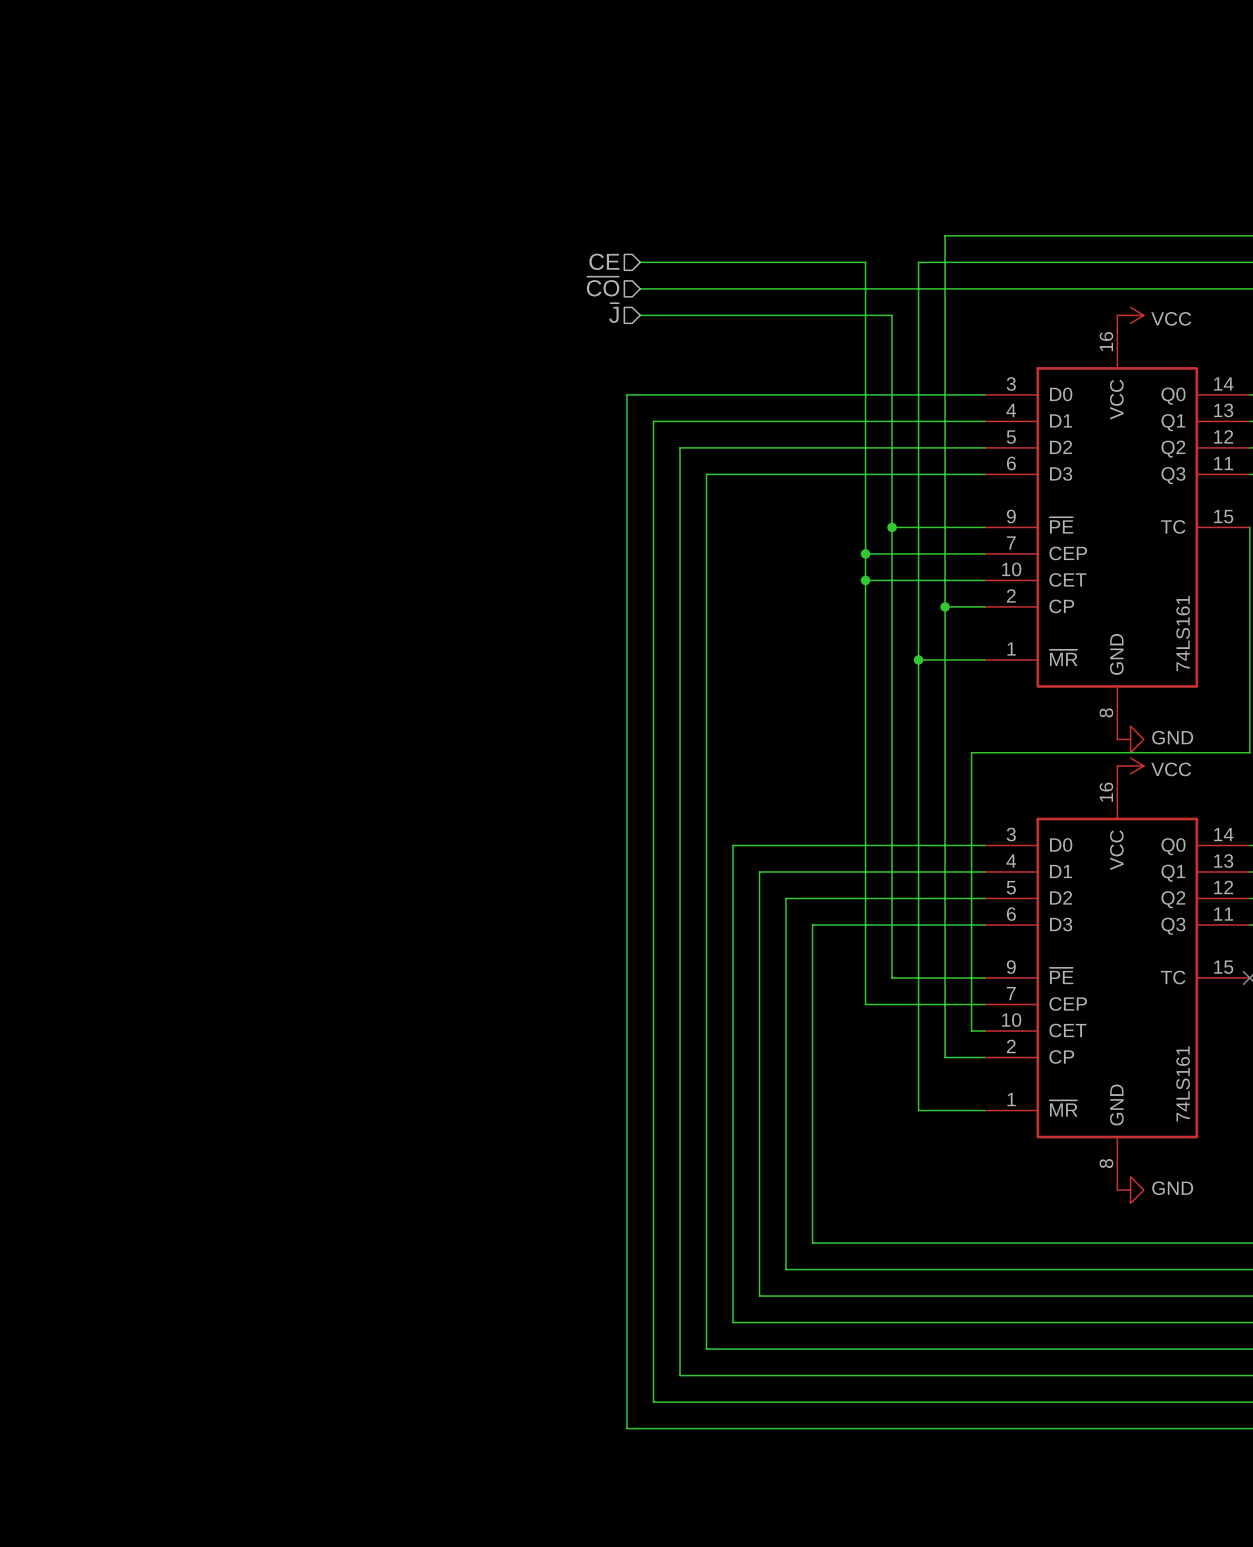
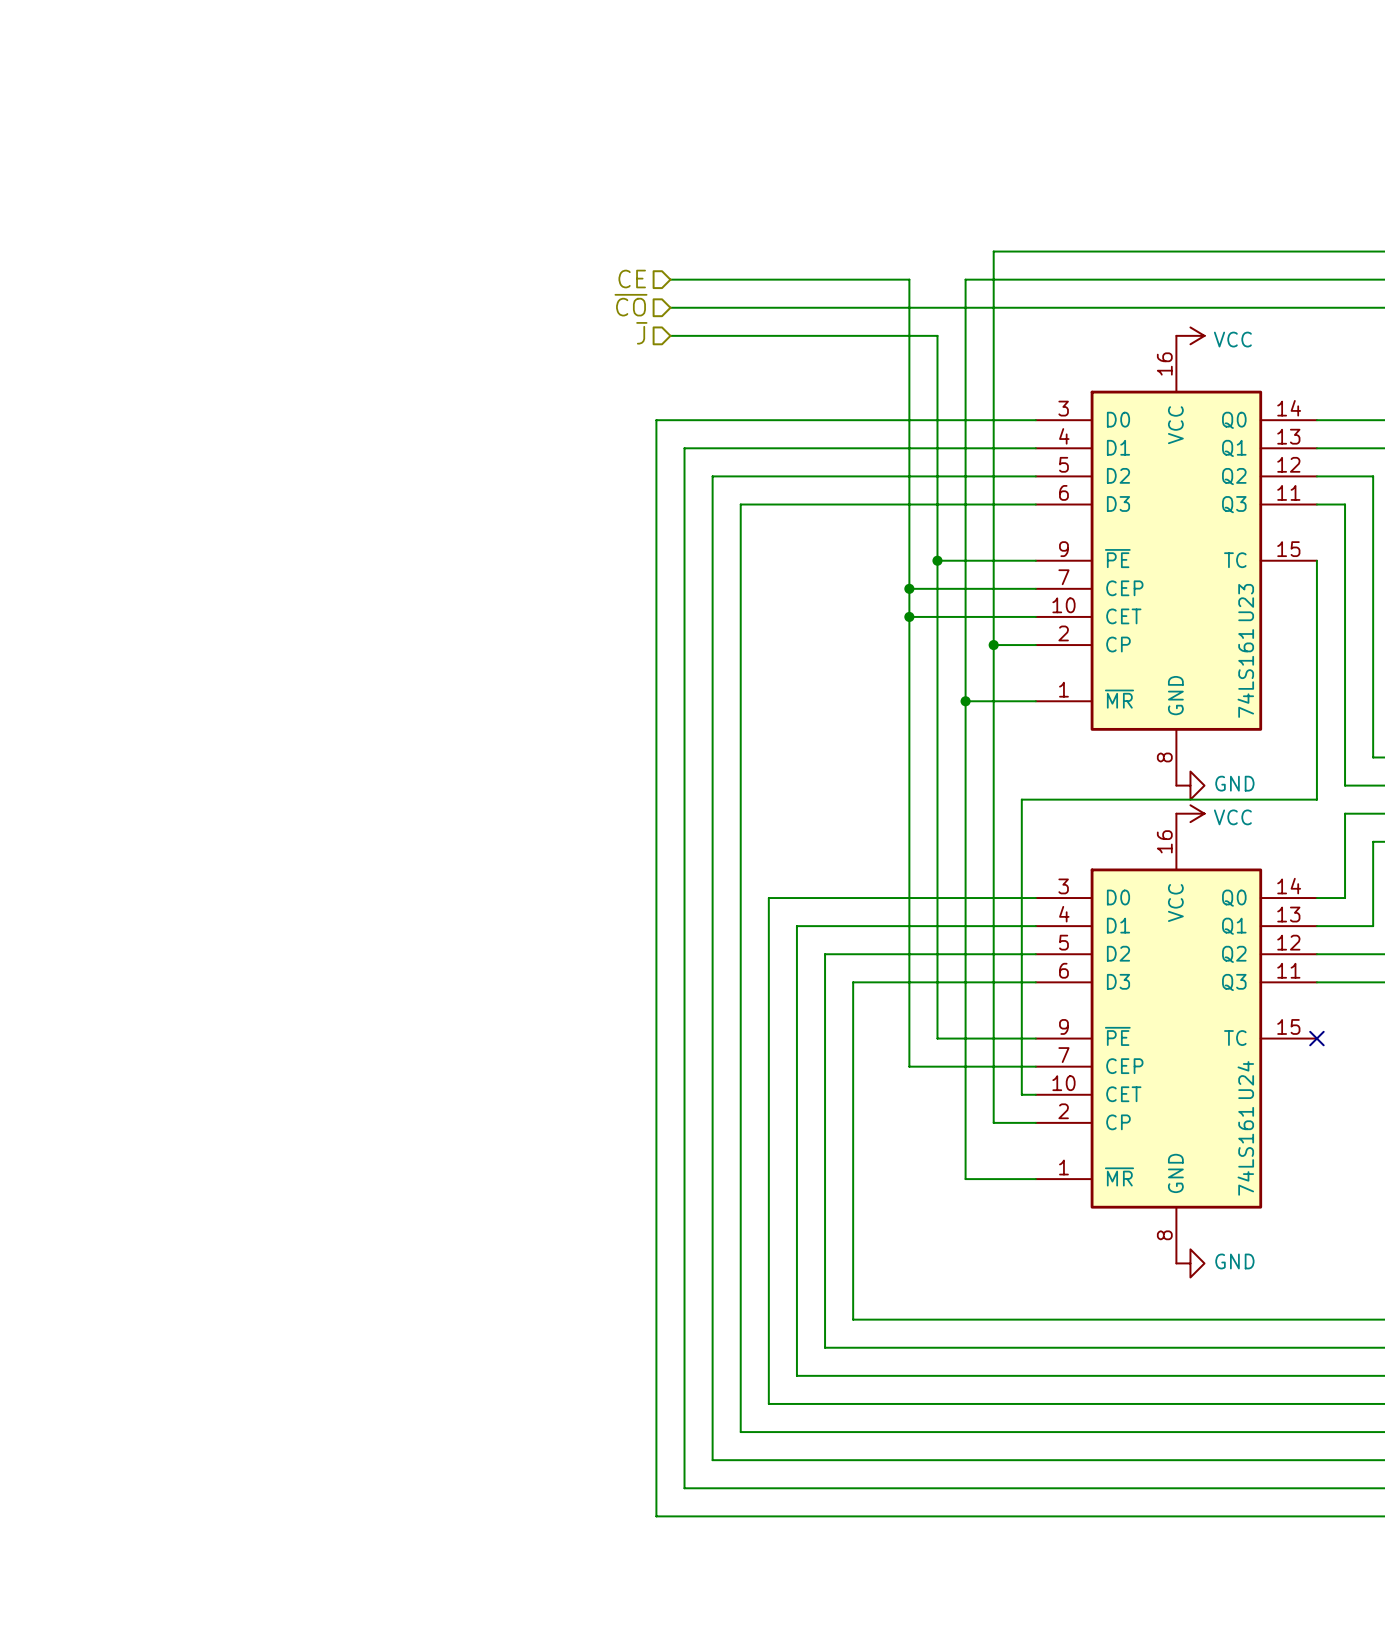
U23 name: none -> U23 (1246, 602)
U24 name: none -> U24 (1245, 1080)

